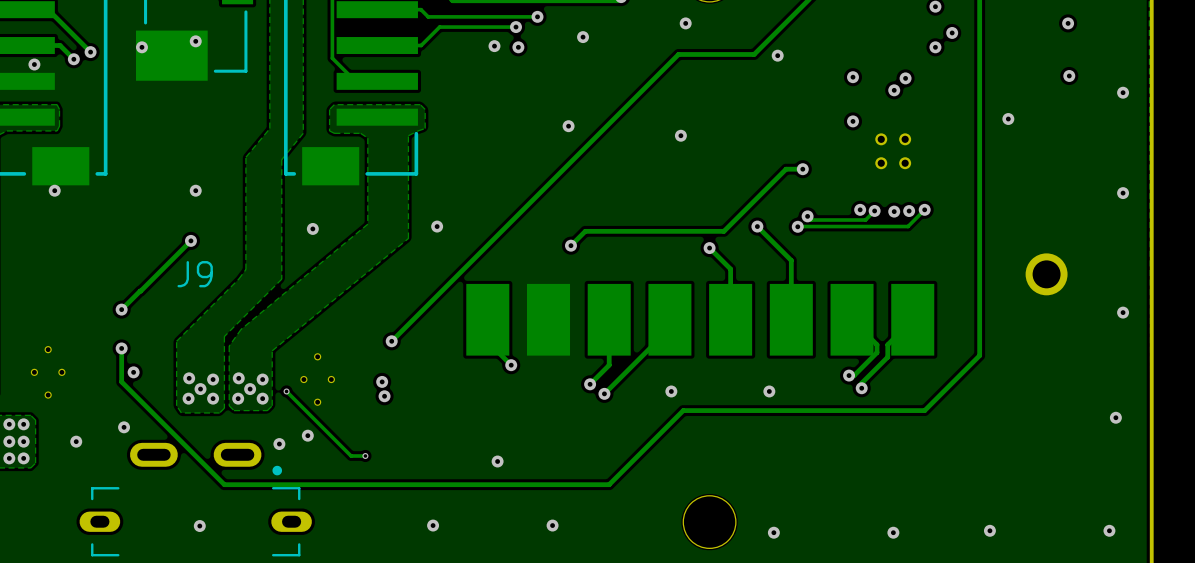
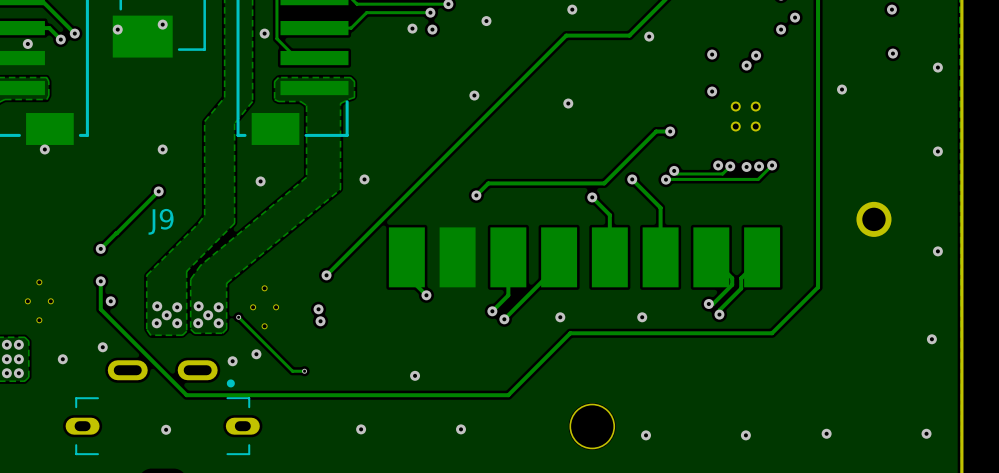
via: none -> (264, 33)

